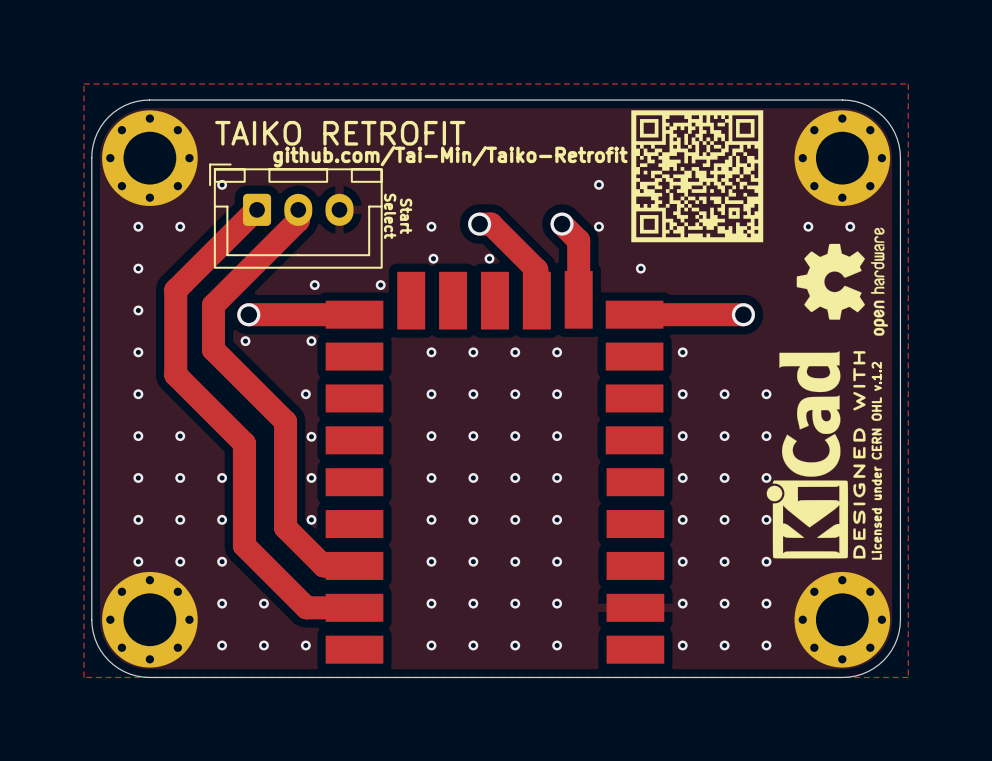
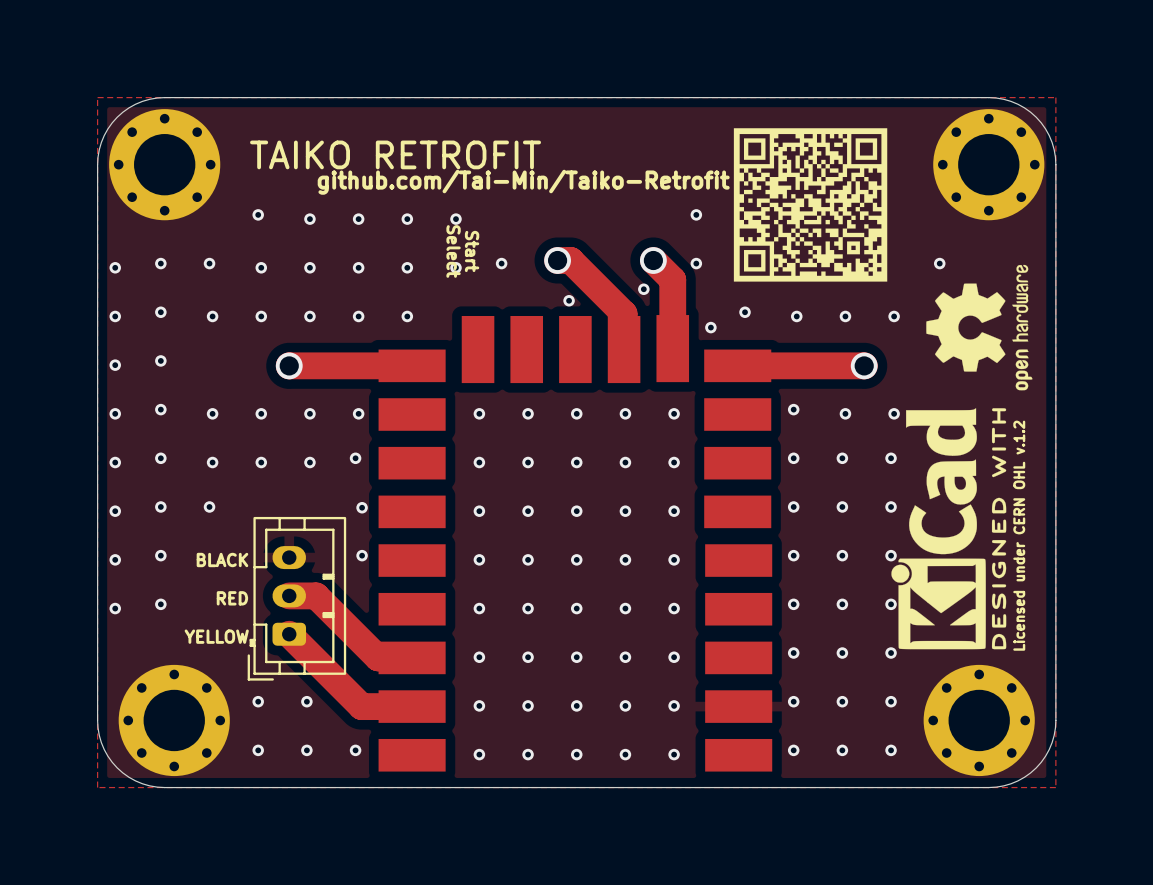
part position: (149, 158) -> (164, 164)
part position: (842, 158) -> (988, 164)
via: none -> (309, 219)
via: none -> (358, 219)
via: none -> (407, 219)
via: none -> (455, 219)
track: (257, 209) (175, 290) (175, 374) (244, 443) (244, 545) (306, 607) (311, 607) -> (289, 634) (361, 706)
track: (298, 209) (298, 220) (213, 305) (213, 349) (285, 421) (285, 527) (325, 565) -> (289, 595) (316, 595) (378, 657)
part: (295, 216) -> none
via: (850, 226) -> none
via: none -> (115, 267)
via: none -> (261, 267)
via: none -> (309, 267)
via: none -> (358, 267)
via: none -> (407, 267)
via: none -> (455, 267)
via: none -> (643, 289)
via: (433, 258) -> none
via: none -> (115, 316)
via: none -> (212, 316)
via: none -> (261, 316)
via: none -> (309, 316)
via: none -> (407, 316)
via: none -> (796, 316)
via: none -> (845, 316)
via: none -> (894, 316)
via: none -> (710, 327)
via position: (314, 285) -> (358, 316)
via: (380, 285) -> none
via: none -> (115, 365)
via: (245, 341) -> none
via position: (311, 341) -> (358, 413)
via: (431, 352) -> none
via: (473, 352) -> none
via: (515, 352) -> none
via: (557, 352) -> none
via: none -> (115, 413)
via: none -> (212, 413)
via: none -> (261, 413)
via: none -> (309, 413)
via: none -> (479, 413)
via: none -> (528, 413)
via: none -> (576, 413)
via: none -> (625, 413)
via: none -> (674, 413)
via: none -> (845, 413)
via: none -> (894, 413)
via: (431, 394) -> none
via: (473, 394) -> none
via: (515, 394) -> none
via: (557, 394) -> none
via: none -> (115, 462)
via: none -> (212, 462)
via: none -> (261, 462)
via: none -> (309, 462)
via: none -> (479, 462)
via: none -> (528, 462)
via: none -> (576, 462)
via: none -> (625, 462)
via: none -> (674, 462)
via: (431, 436) -> none
via: (473, 436) -> none
via: (515, 436) -> none
via: (557, 436) -> none
via: none -> (115, 511)
via: none -> (479, 511)
via: none -> (528, 511)
via: none -> (576, 511)
via: none -> (625, 511)
via: none -> (674, 511)
via: (180, 477) -> none
via: (222, 477) -> none
via: (431, 477) -> none
via: (473, 477) -> none
via: (515, 477) -> none
via: (557, 477) -> none
via: none -> (115, 559)
text: none -> BLACK (222, 559)
via: none -> (479, 559)
via: none -> (528, 559)
via: none -> (576, 559)
via: none -> (625, 559)
via: none -> (674, 559)
text: none -> RED (232, 598)
part: none -> (296, 598)
via: (180, 519) -> none
via: (222, 519) -> none
via: (311, 519) -> none
via: (431, 519) -> none
via: (473, 519) -> none
via: (515, 519) -> none
via: (557, 519) -> none
via: none -> (115, 608)
via: none -> (479, 608)
via: none -> (528, 608)
via: none -> (576, 608)
via: none -> (625, 608)
via: none -> (674, 608)
text: none -> YELLOW (216, 636)
via: (138, 561) -> none
via: (180, 561) -> none
via: (222, 561) -> none
via: (431, 561) -> none
via: (473, 561) -> none
via: (515, 561) -> none
via: (557, 561) -> none
via: none -> (479, 657)
via: none -> (528, 657)
via: none -> (576, 657)
via: none -> (625, 657)
via: none -> (674, 657)
via: (431, 603) -> none
via: (473, 603) -> none
via: (515, 603) -> none
via: (557, 603) -> none
via: none -> (479, 705)
via: none -> (528, 705)
via: none -> (576, 705)
via: none -> (625, 705)
via: none -> (674, 705)
via: (431, 645) -> none
via: (473, 645) -> none
via: (515, 645) -> none
via: (557, 645) -> none
via: none -> (479, 754)
via: none -> (528, 754)
via: none -> (576, 754)
via: none -> (625, 754)
via: none -> (674, 754)
board edge: (149, 677) (130, 674) (113, 664) (100, 650) (92, 626) (91, 157) (97, 132) (113, 112) (130, 103) (149, 100) (842, 100) (861, 103) (883, 116) (897, 138) (900, 157) (900, 626) (894, 644) (883, 660) (867, 671) (842, 677) -> (173, 787) (149, 785) (135, 780) (122, 772) (112, 762) (104, 749) (99, 735) (97, 720) (98, 157) (104, 135) (117, 117) (135, 104) (149, 99) (164, 97) (988, 97) (1010, 101) (1030, 112) (1041, 122) (1049, 135) (1054, 149) (1055, 164) (1055, 727) (1052, 742) (1045, 756) (1030, 772) (1017, 780) (1003, 785) (979, 787)

